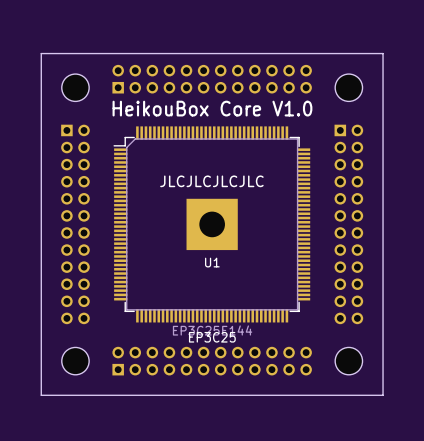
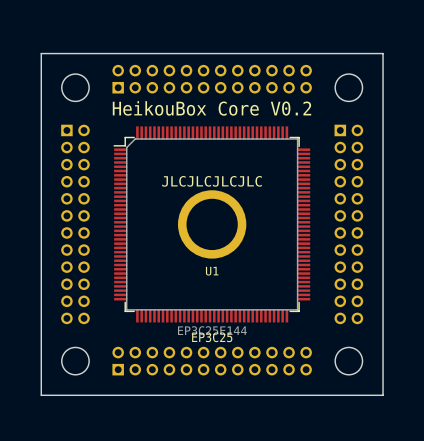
text: HeikouBox Core V1.0 (212, 108) -> HeikouBox Core V0.2 (211, 108)
U1 footprint: [113, 126, 311, 323] -> [113, 126, 311, 323]

